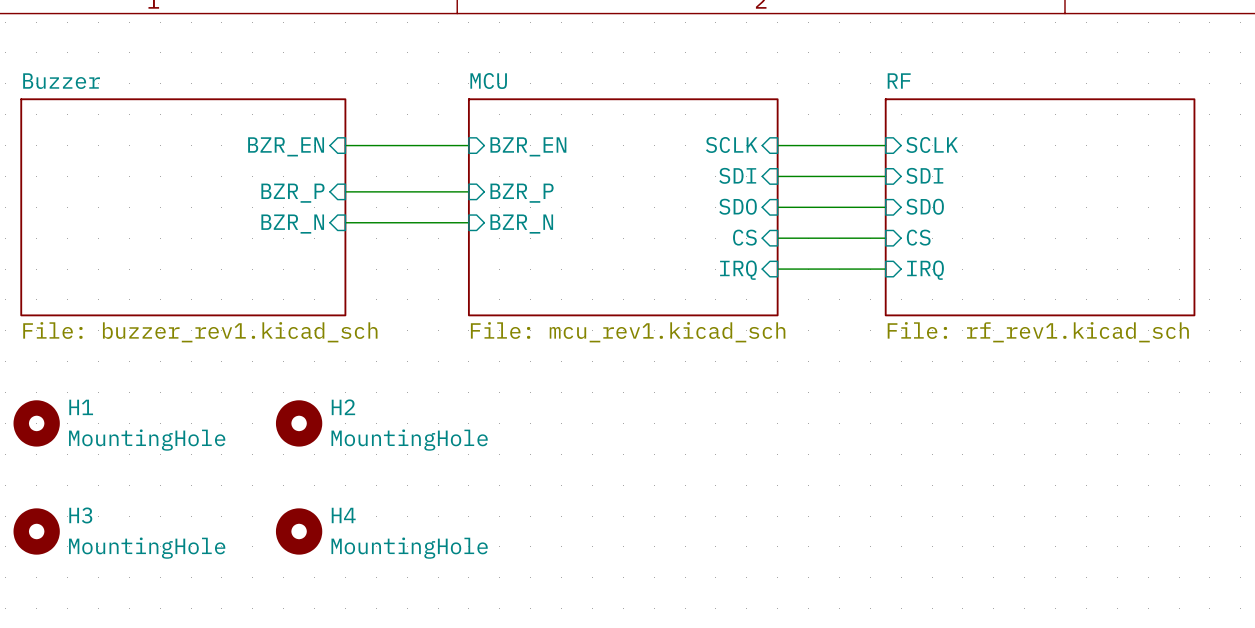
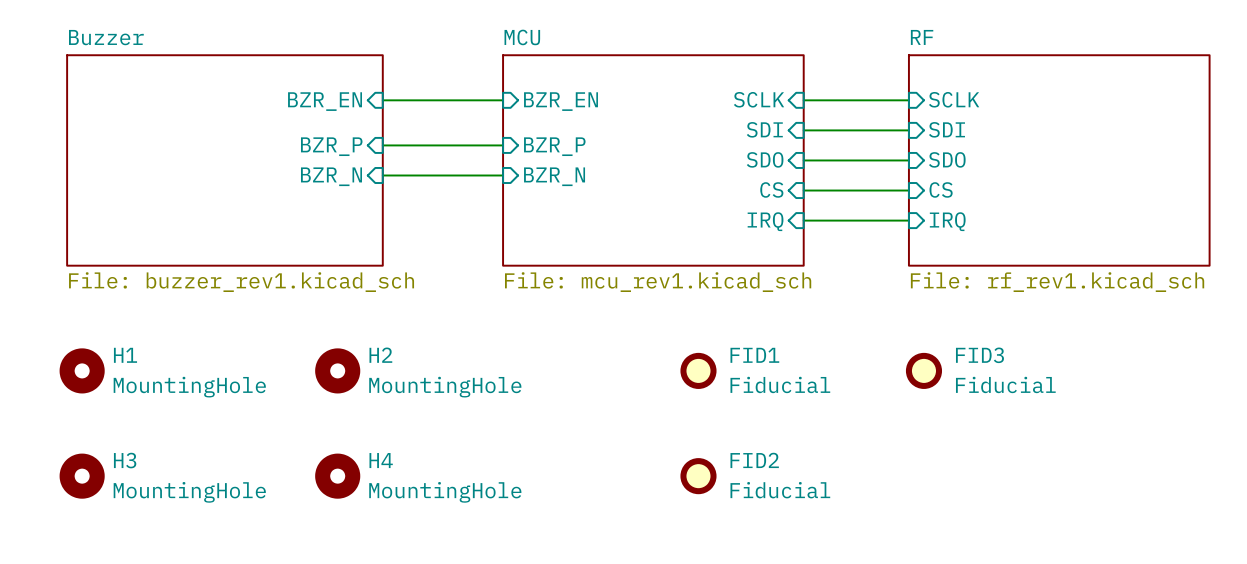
FID1: none -> Fiducial (698, 370)
FID3: none -> Fiducial (923, 370)
FID2: none -> Fiducial (698, 476)

